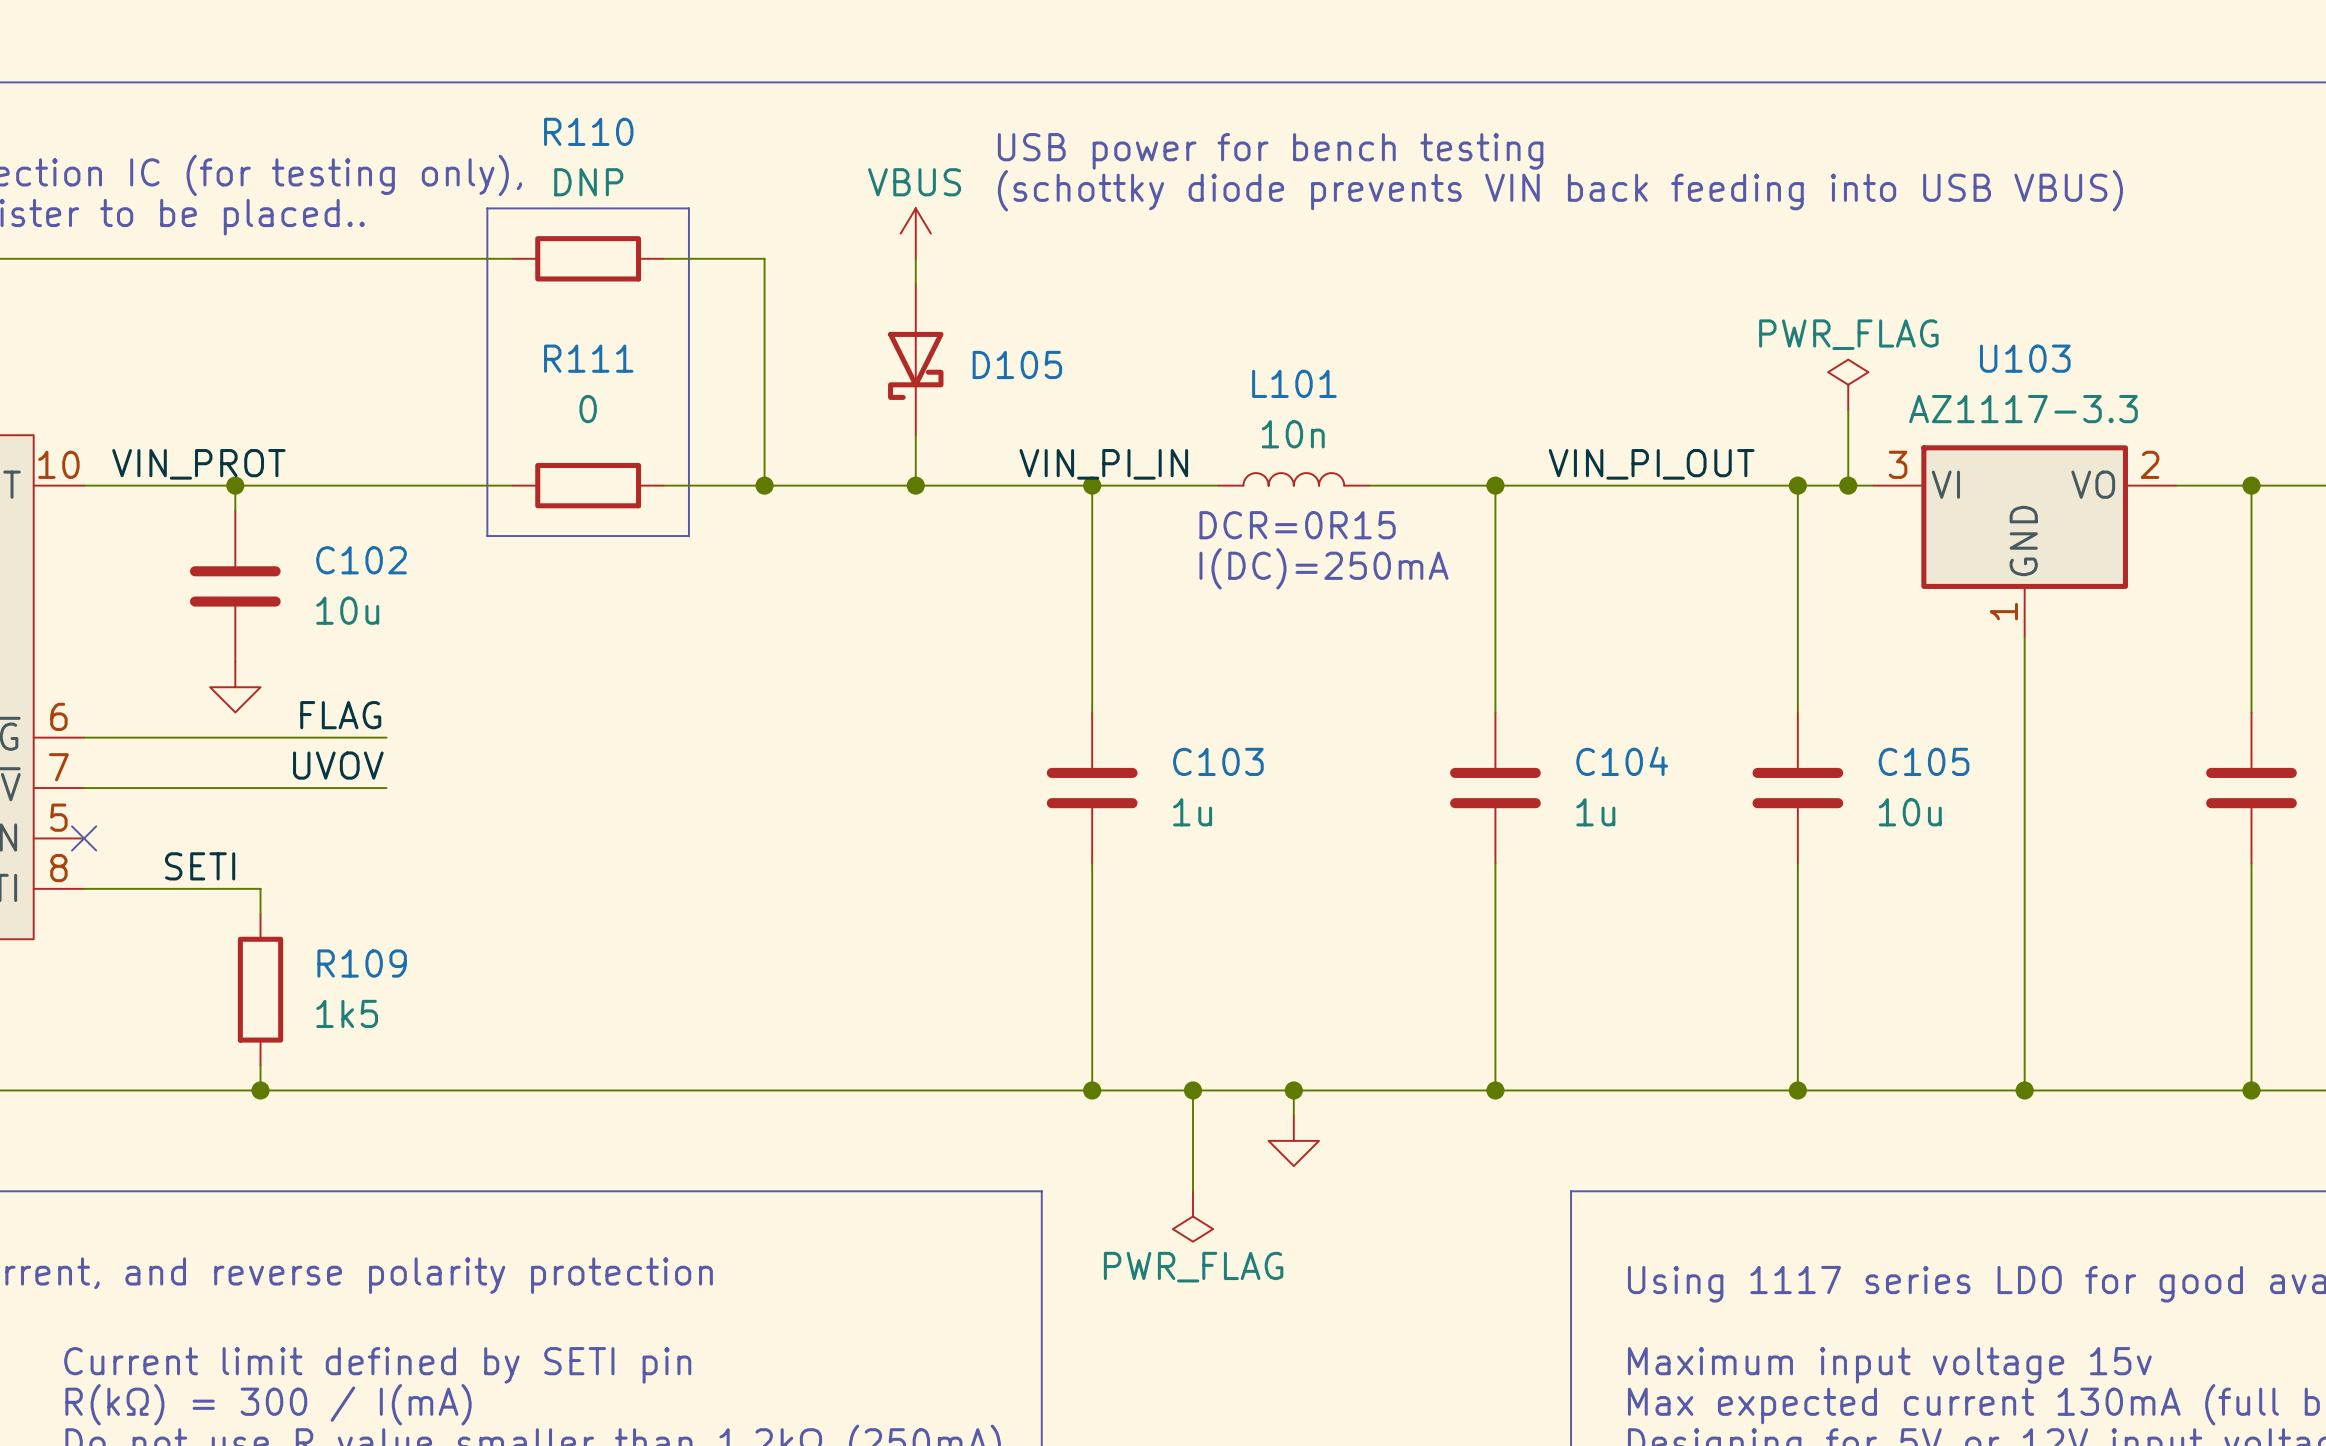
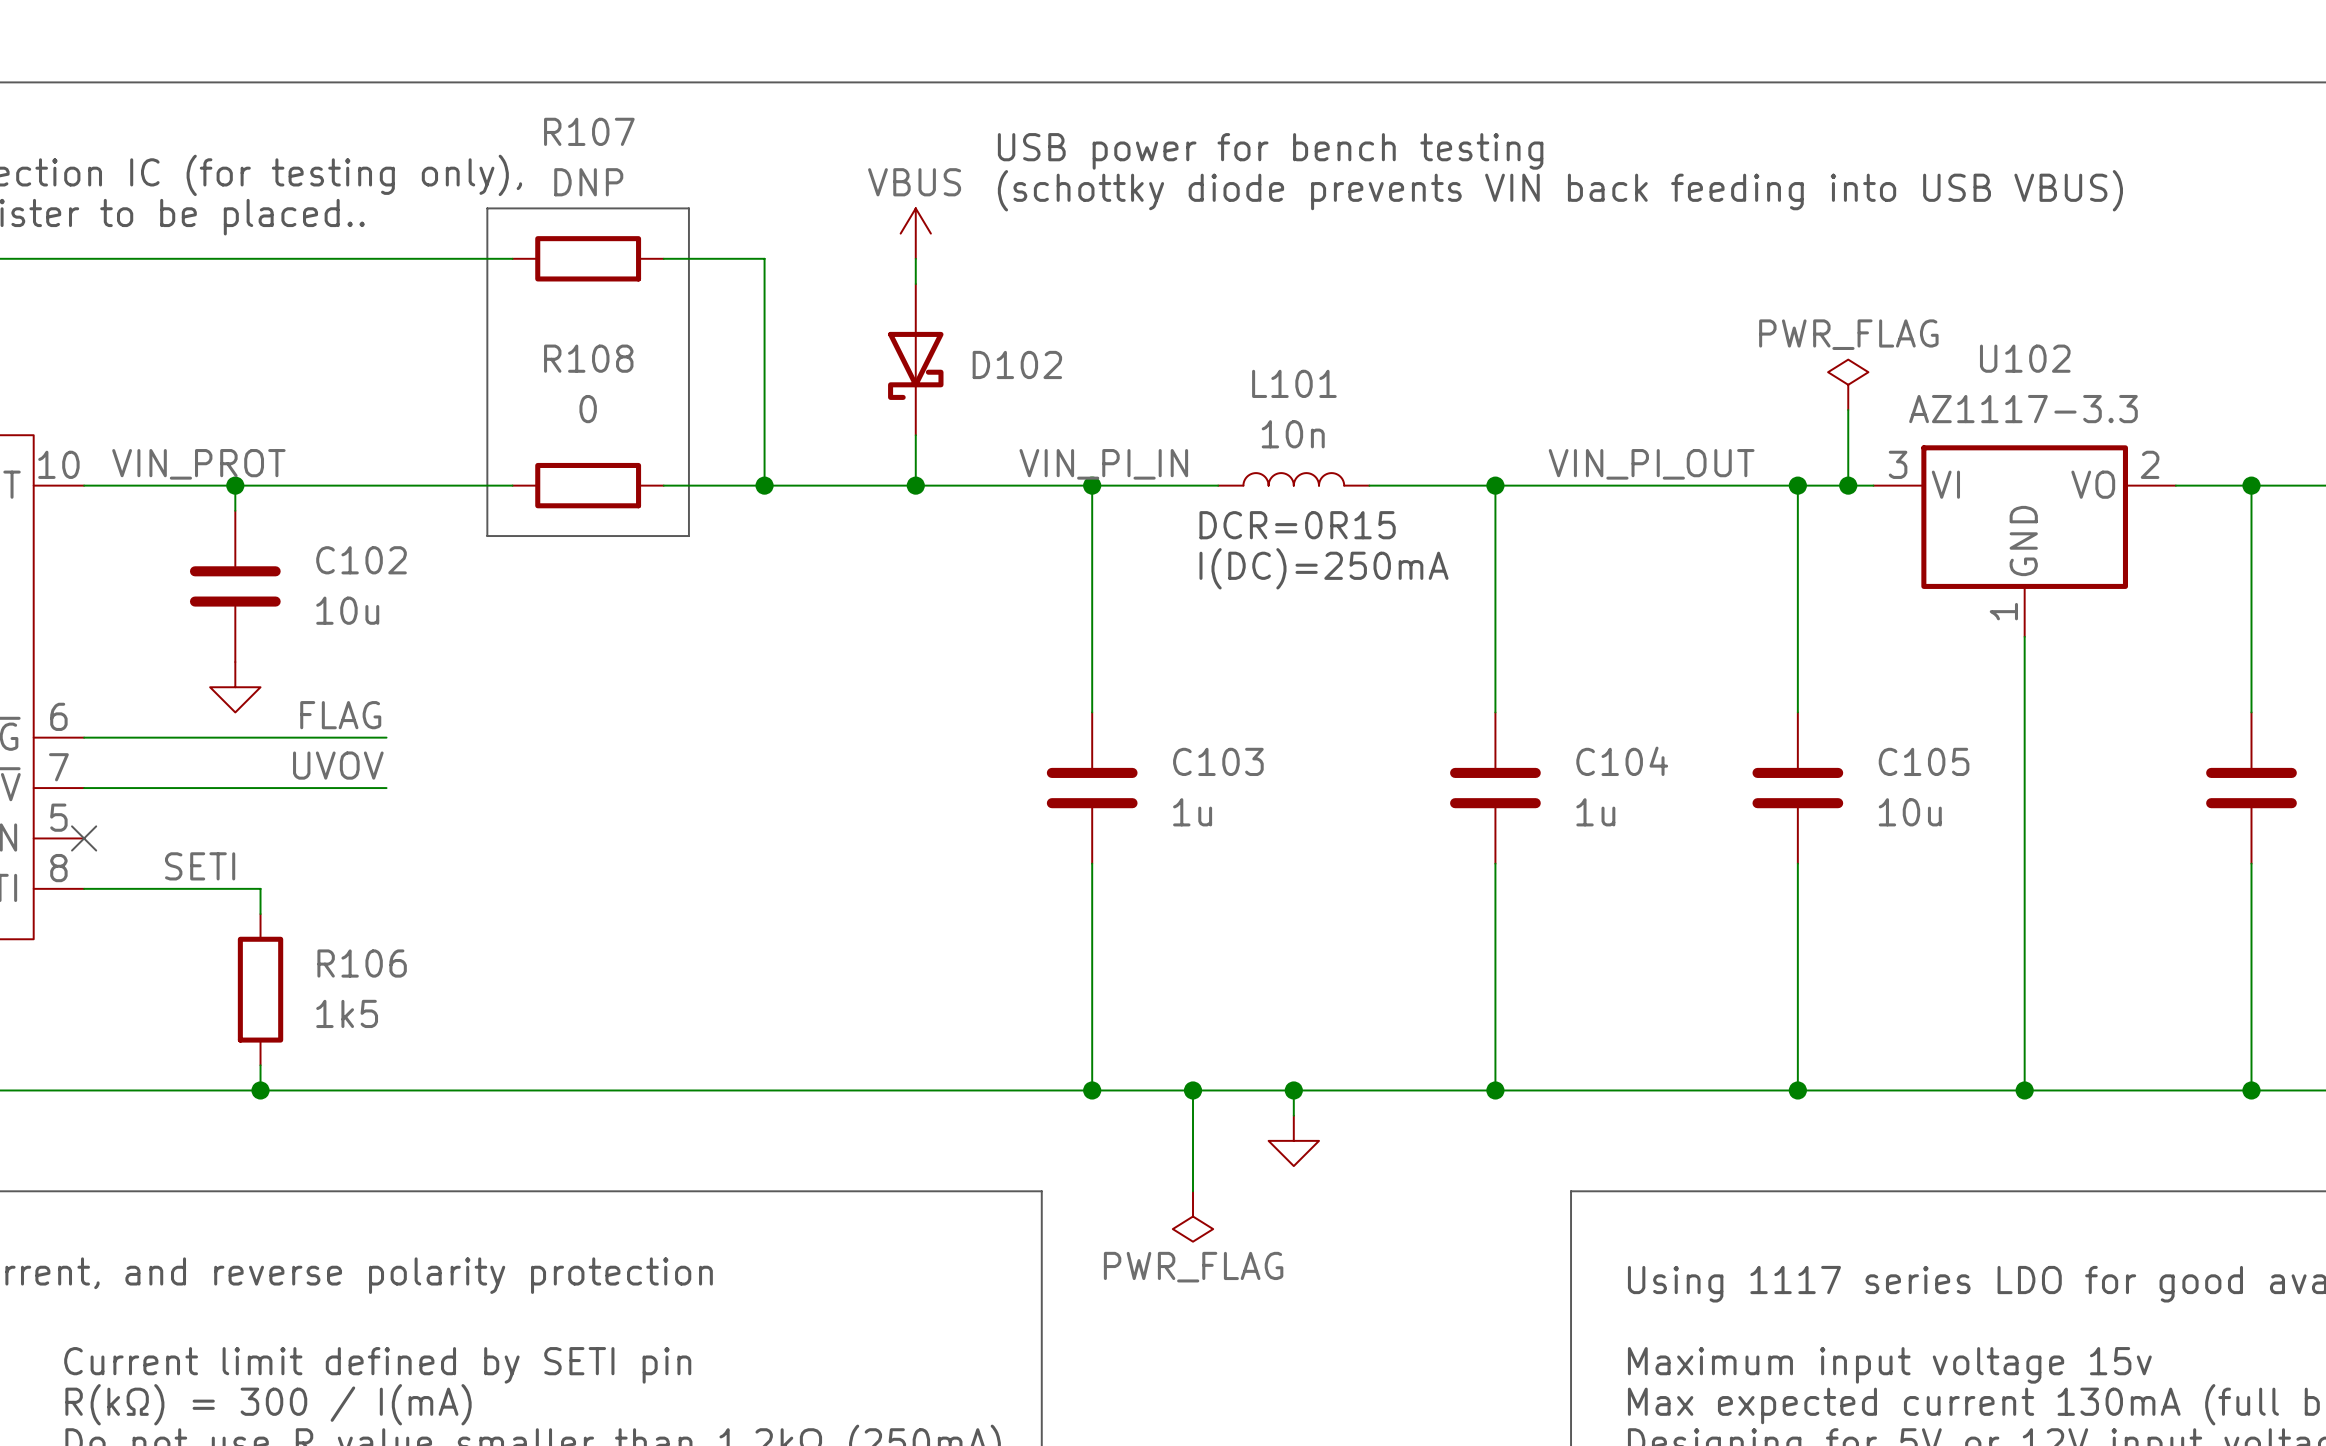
R110 name: R110 (588, 131) -> R107 (589, 131)
R111 name: R111 (588, 358) -> R108 (588, 358)
U103 name: U103 (2025, 358) -> U102 (2025, 358)
D105 name: D105 (1017, 364) -> D102 (1017, 364)
R109 name: R109 (362, 963) -> R106 (362, 963)

